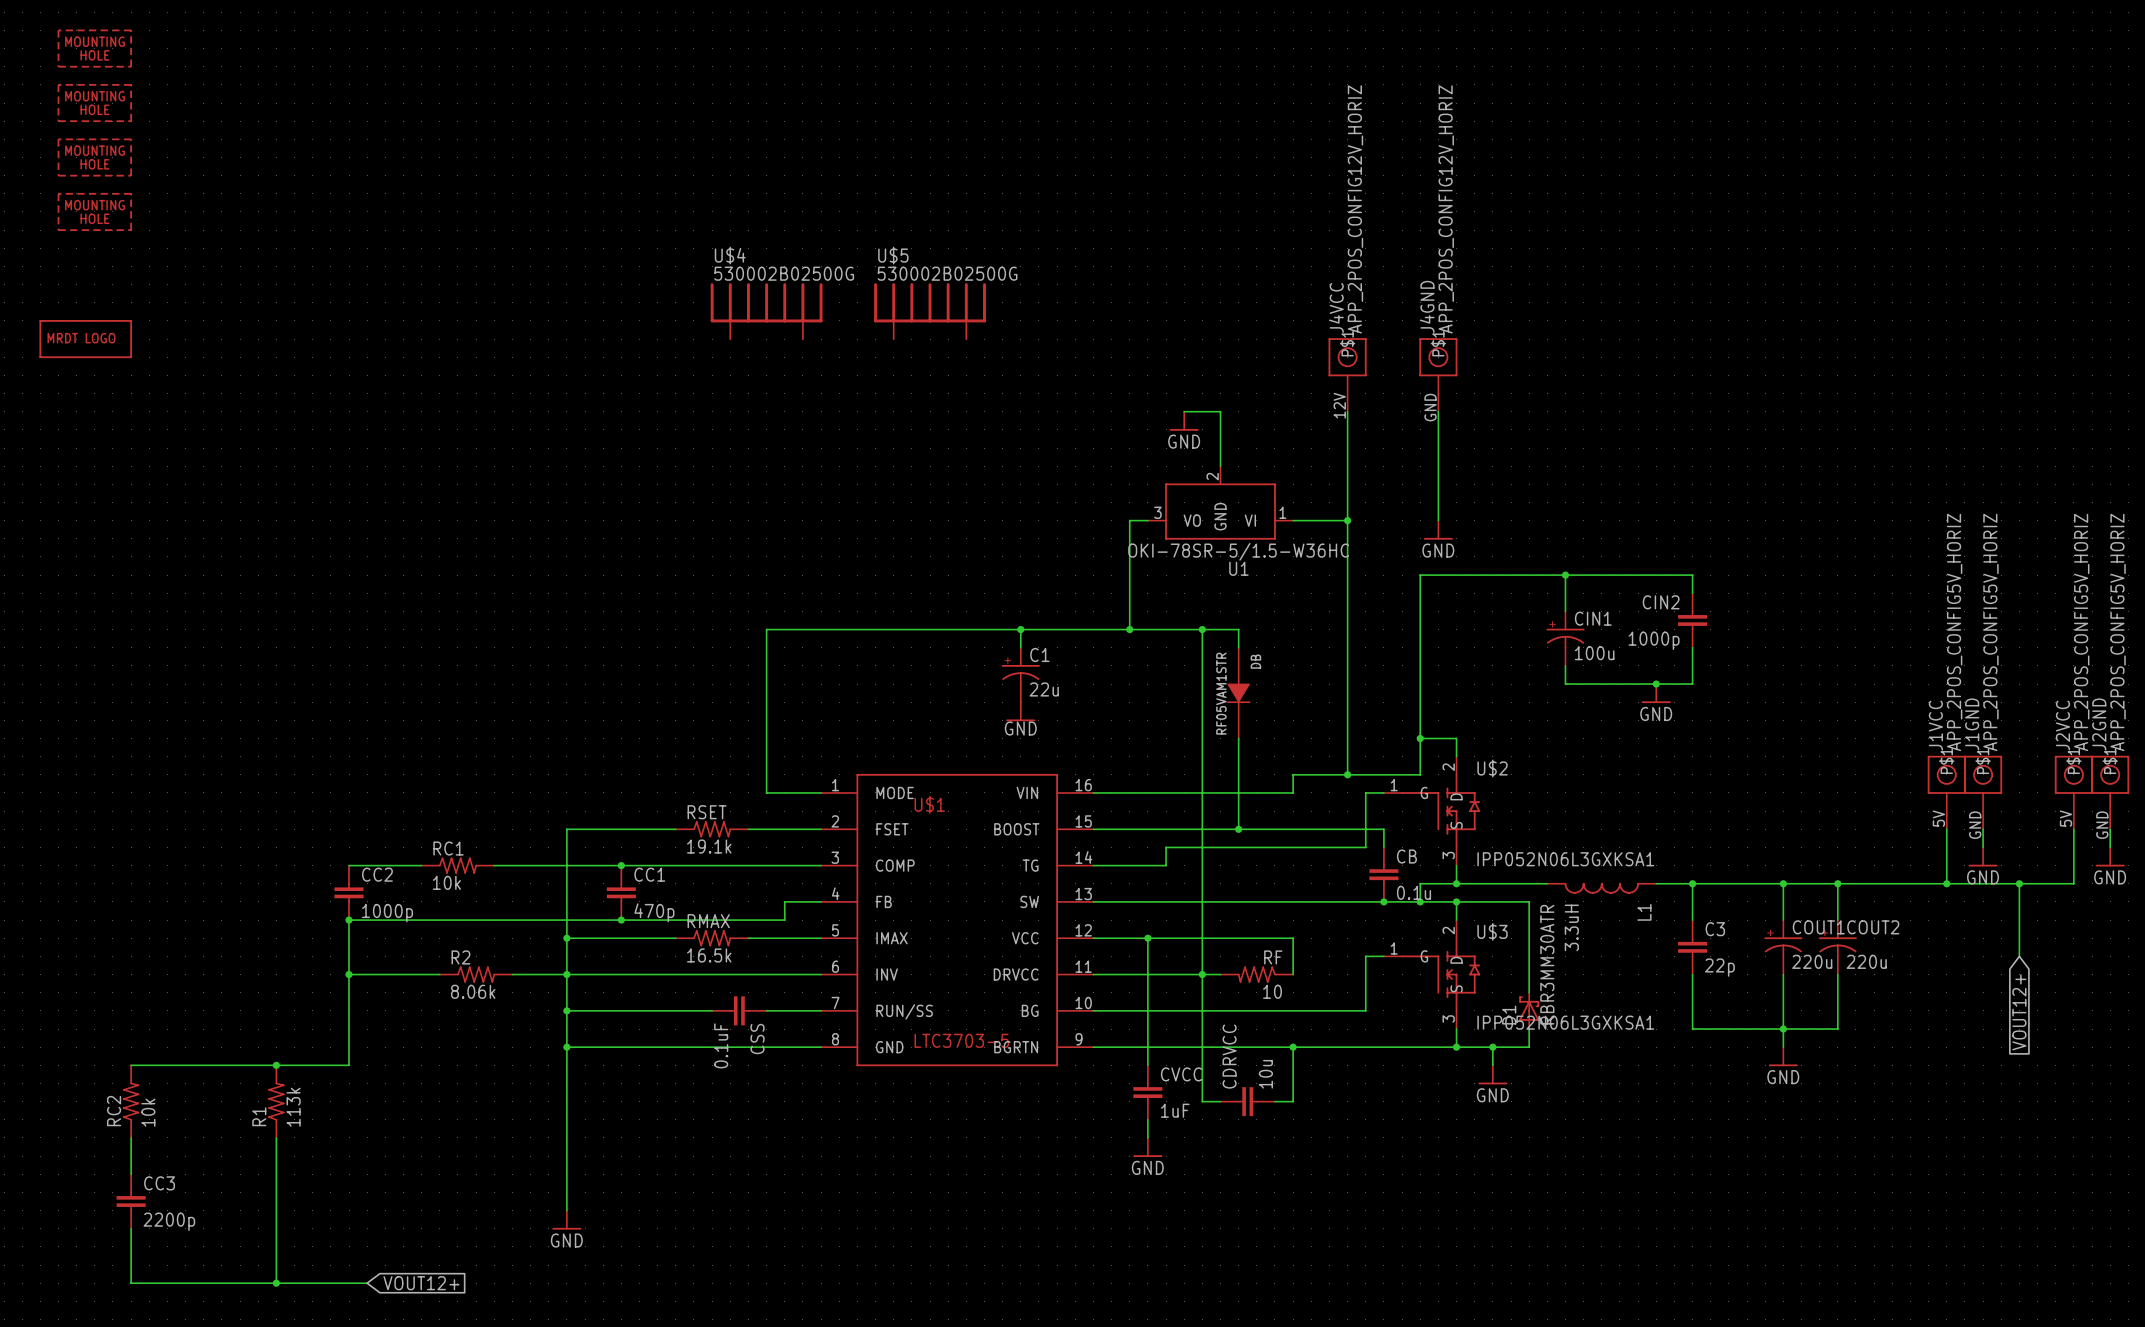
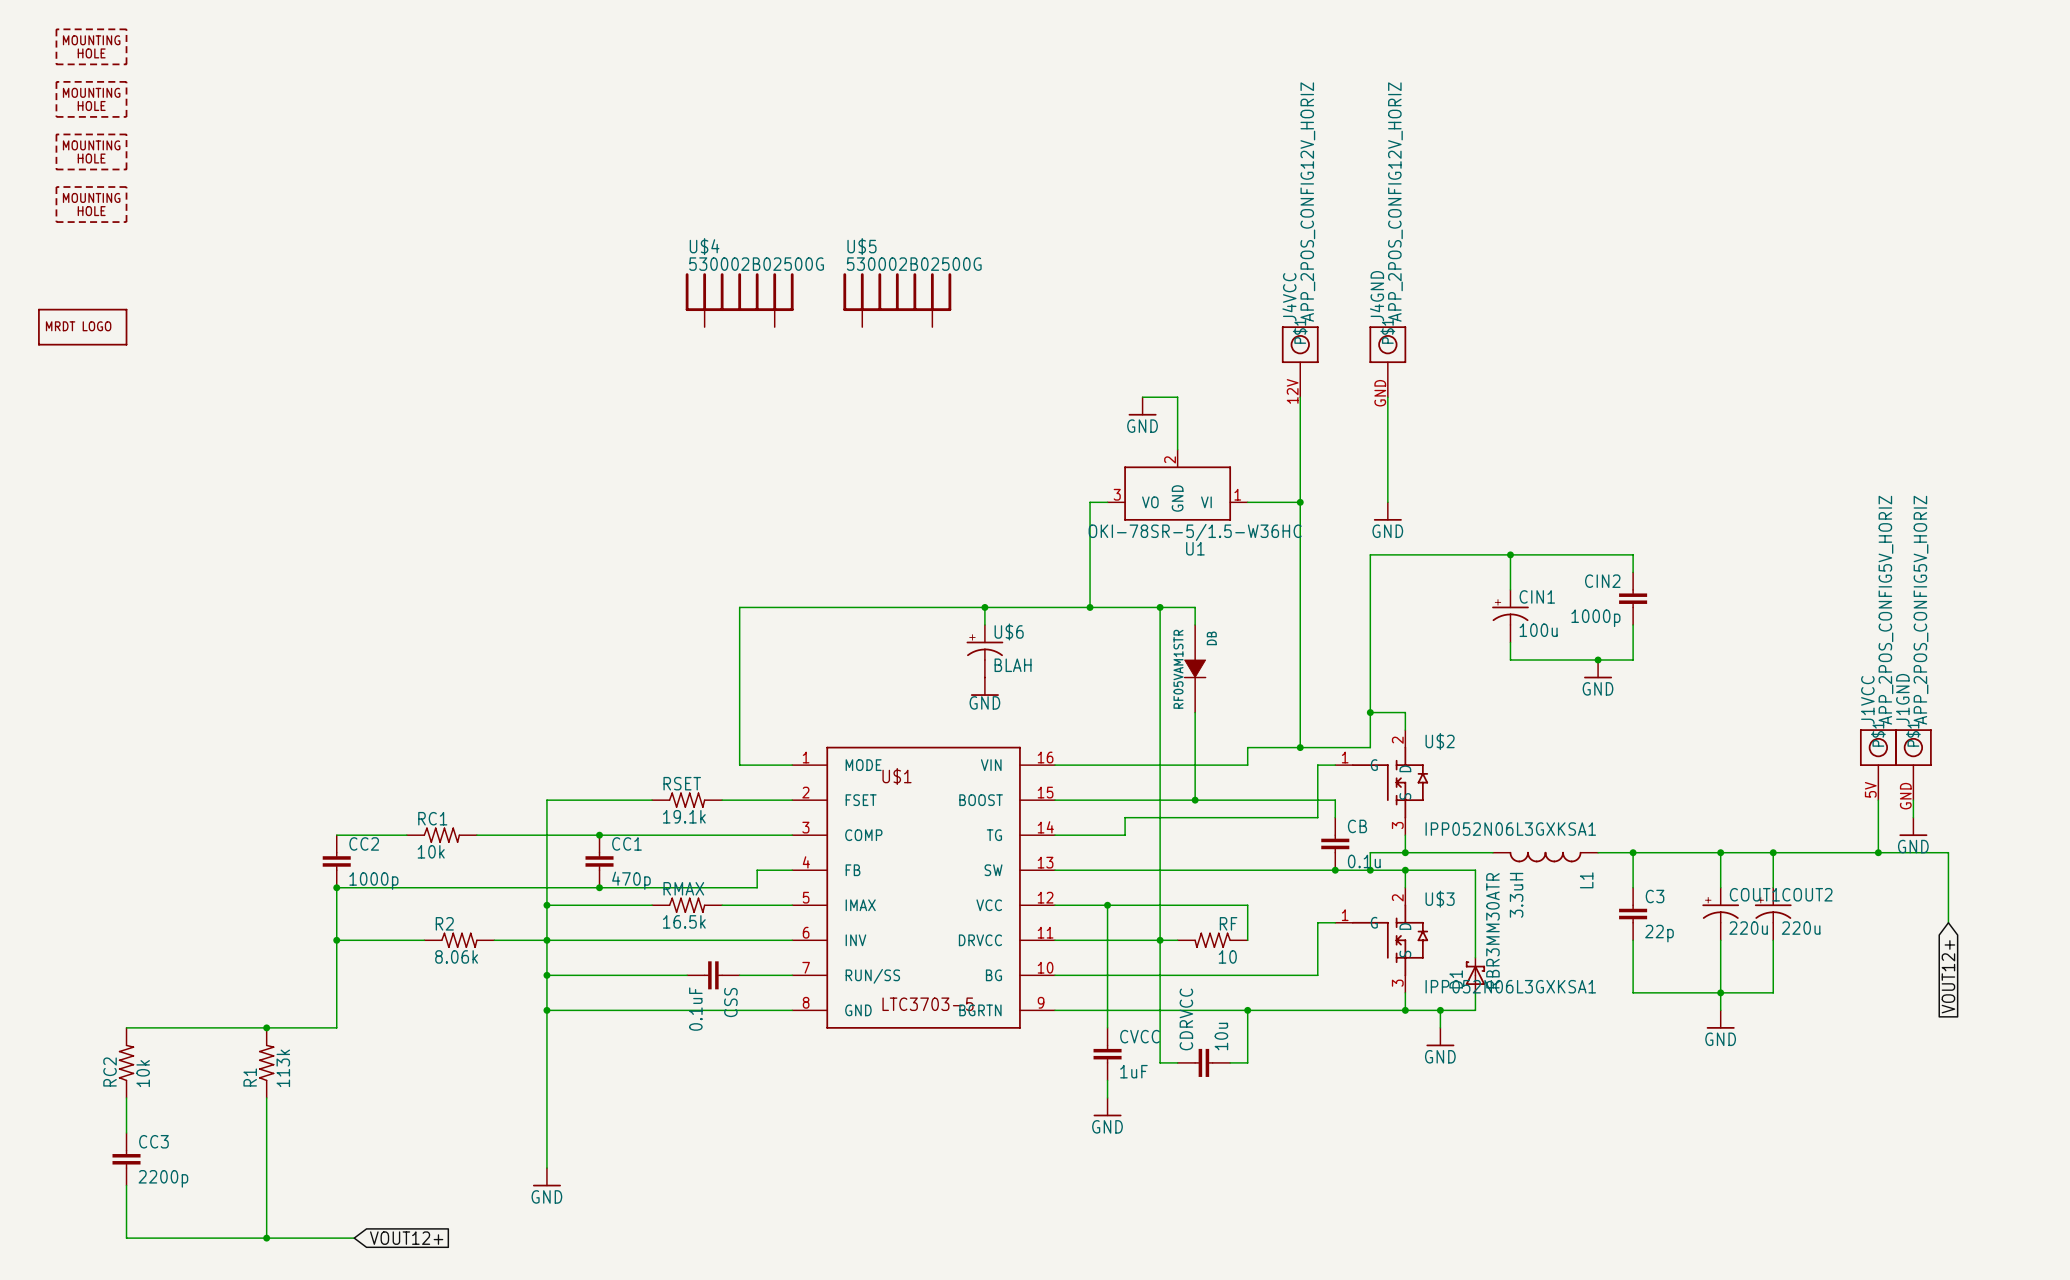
C1 name: C1 (1039, 654) -> U$6 (1009, 631)
C1 value: 22u (1044, 689) -> BLAH (1013, 665)
J2VCC: APP_2POS_CONFIG5V_HORIZ (2073, 792) -> none
J2GND: APP_2POS_CONFIG5V_HORIZ (2110, 792) -> none
wire: (2073, 829) (2073, 883) (2019, 883) -> none
wire: (2110, 829) (2110, 847) -> none
power symbol: GND (2110, 856) -> none
junction: (2019, 883) -> none

